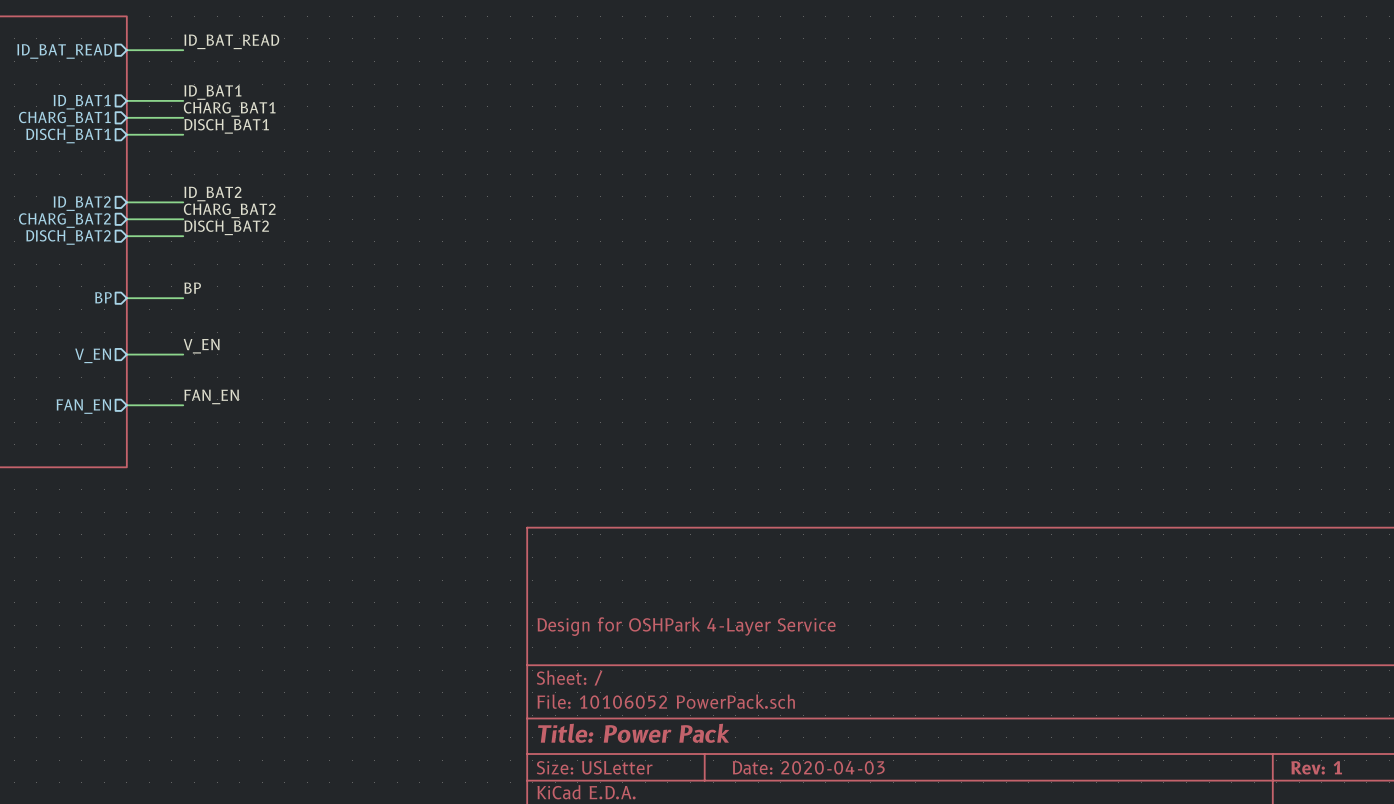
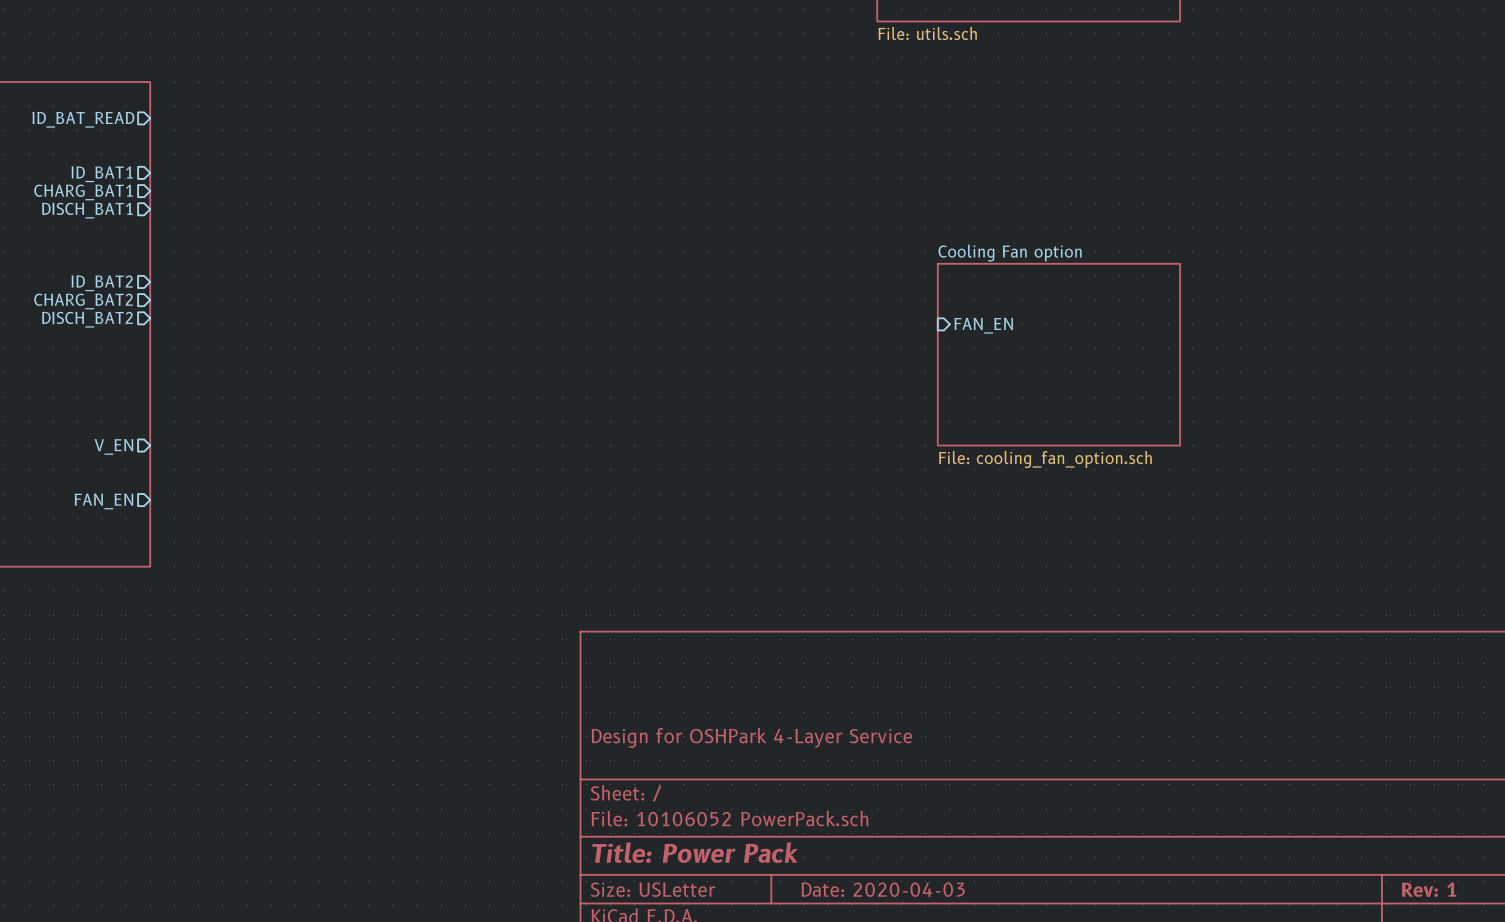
label: ID_BAT_READ (231, 41) -> none
wire: (126, 50) (183, 50) -> none
label: ID_BAT1 (212, 92) -> none
wire: (126, 100) (183, 100) -> none
label: CHARG_BAT1 (229, 109) -> none
wire: (126, 117) (183, 117) -> none
label: DISCH_BAT1 (226, 126) -> none
wire: (126, 134) (183, 134) -> none
label: ID_BAT2 (212, 194) -> none
wire: (126, 202) (183, 202) -> none
label: CHARG_BAT2 (229, 210) -> none
wire: (126, 219) (183, 219) -> none
label: DISCH_BAT2 (226, 227) -> none
wire: (126, 236) (183, 236) -> none
sheet pin: none -> FAN_EN (983, 325)
sheet Cooling Fan option: none -> File: cooling_fan_option.sch (1058, 354)
label: BP (192, 288) -> none
sheet pin: BP (103, 297) -> none
wire: (126, 298) (183, 298) -> none
label: V_EN (201, 346) -> none
wire: (126, 354) (183, 354) -> none
label: FAN_EN (211, 396) -> none
wire: (126, 405) (183, 405) -> none

